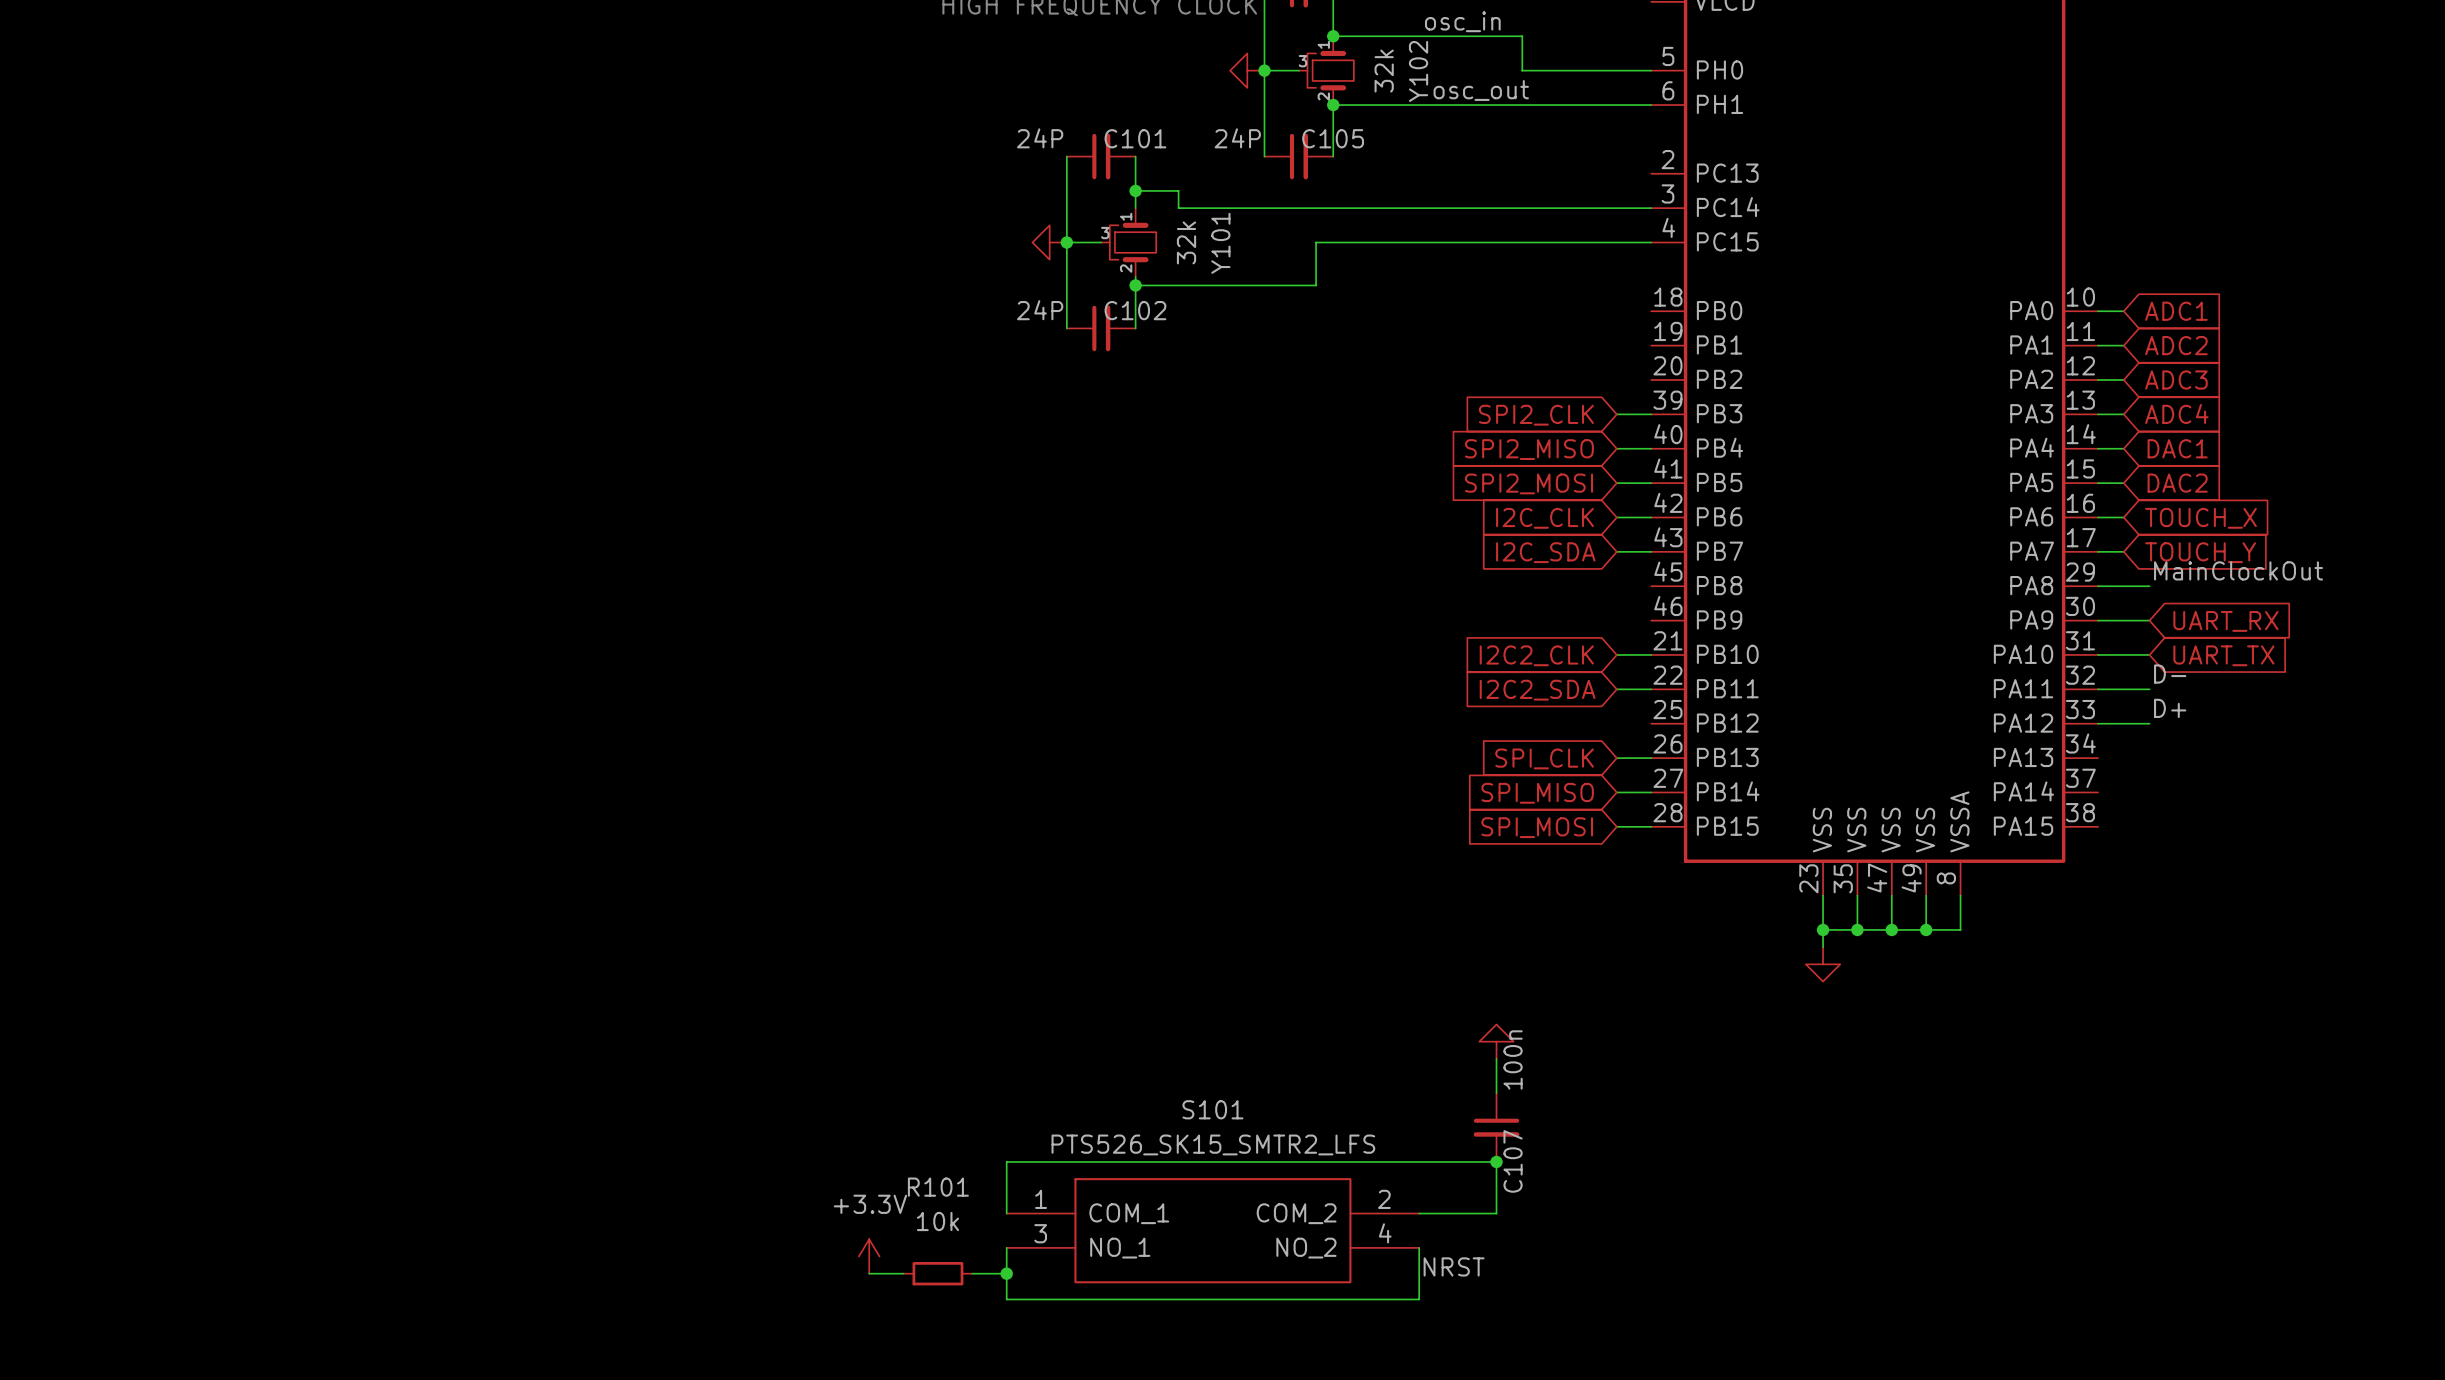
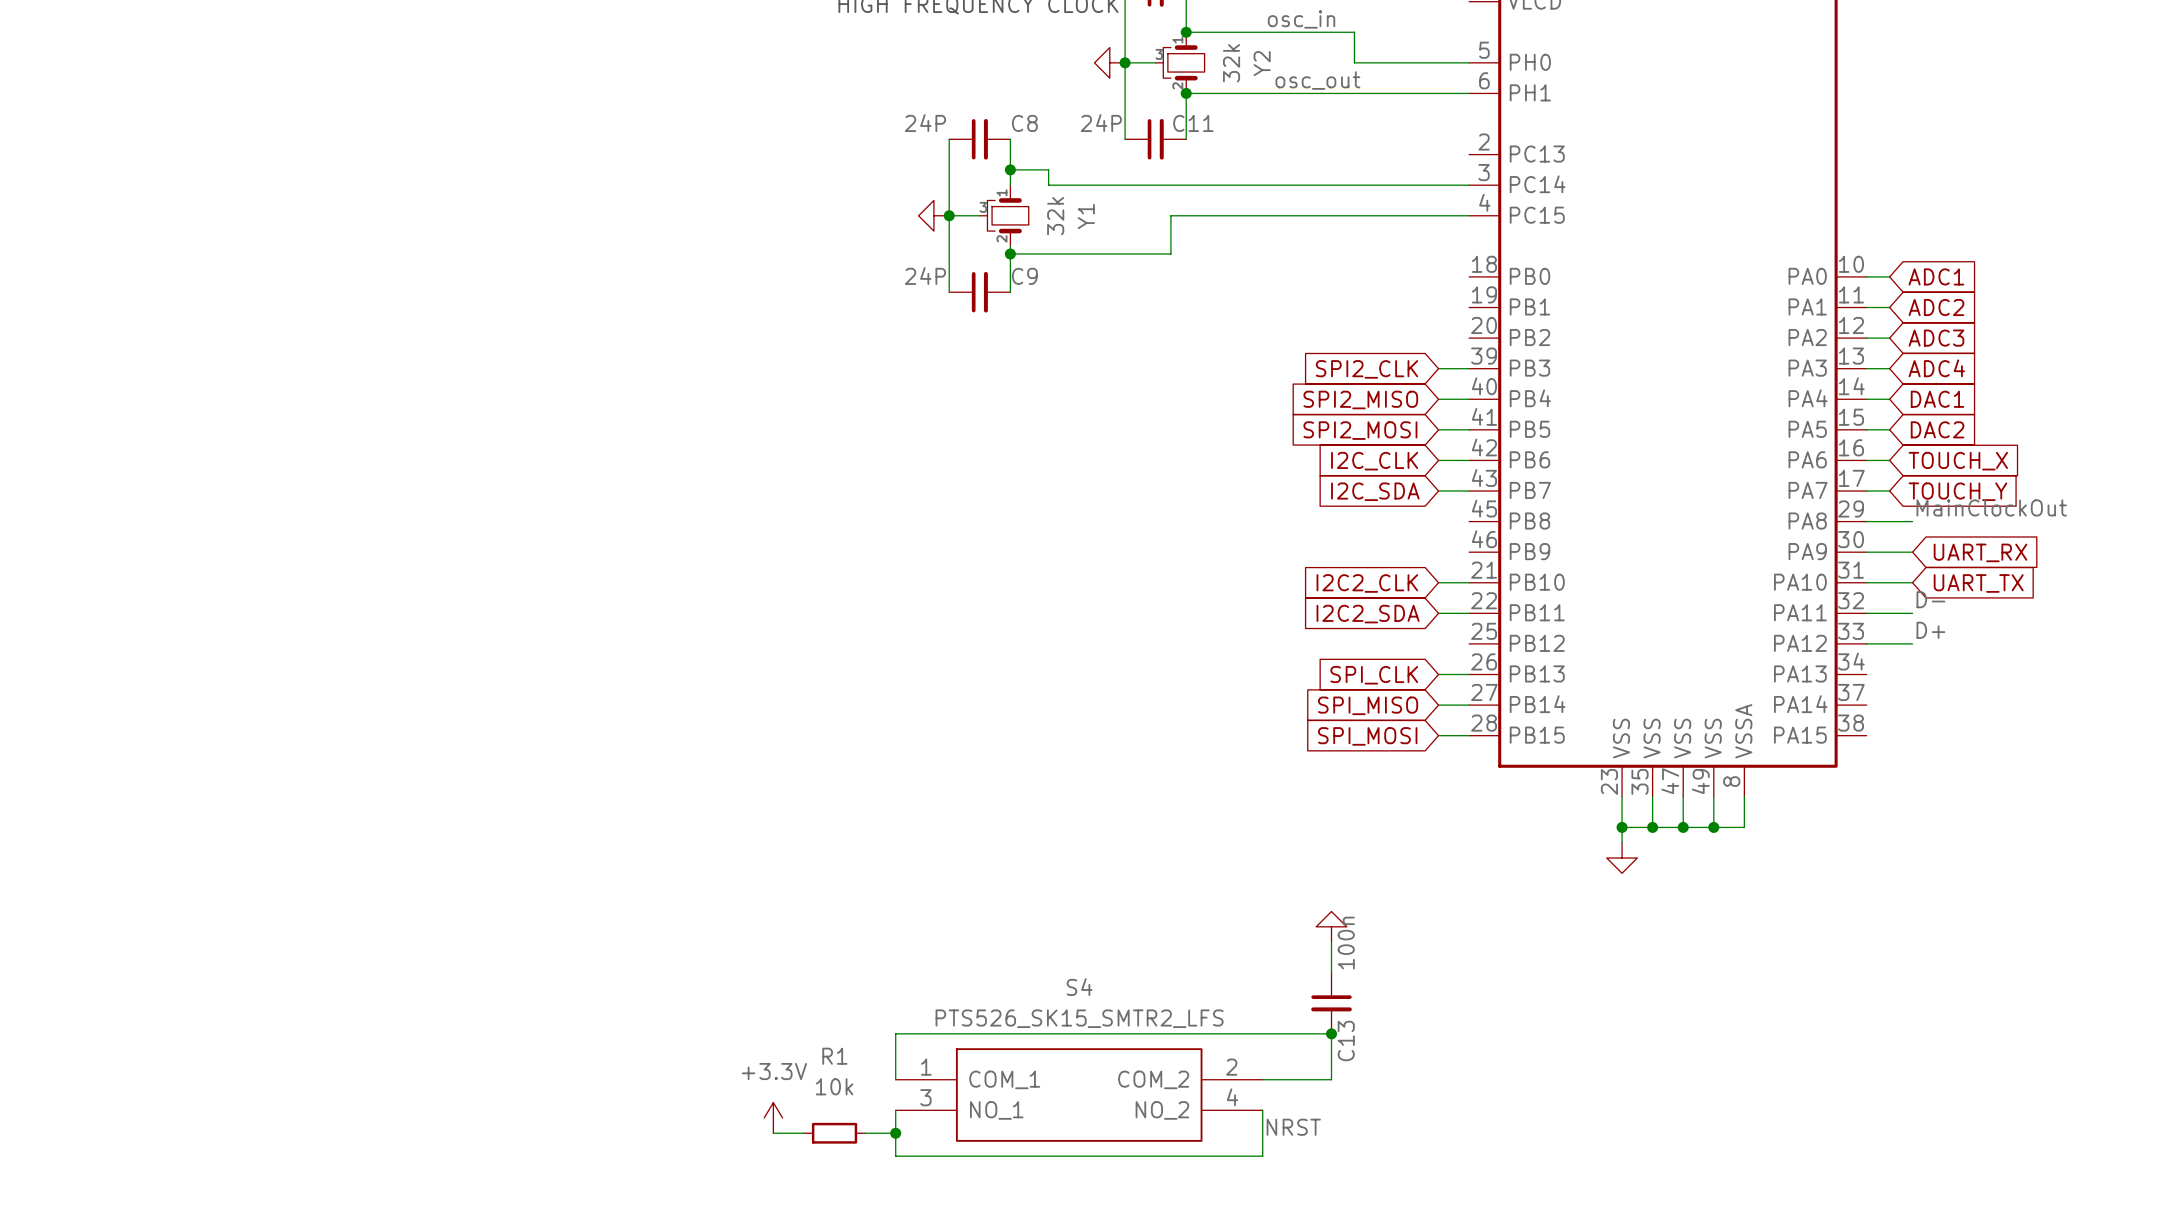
Y102 name: Y102 (1418, 71) -> Y2 (1262, 63)
C101 name: C101 (1135, 138) -> C8 (1024, 123)
C105 name: C105 (1333, 138) -> C11 (1193, 123)
Y101 name: Y101 (1220, 243) -> Y1 (1086, 216)
C102 name: C102 (1135, 310) -> C9 (1024, 276)
S101 name: S101 (1212, 1109) -> S4 (1079, 987)
C107 name: C107 (1513, 1161) -> C13 (1346, 1041)
R101 name: R101 (938, 1187) -> R1 (834, 1056)

